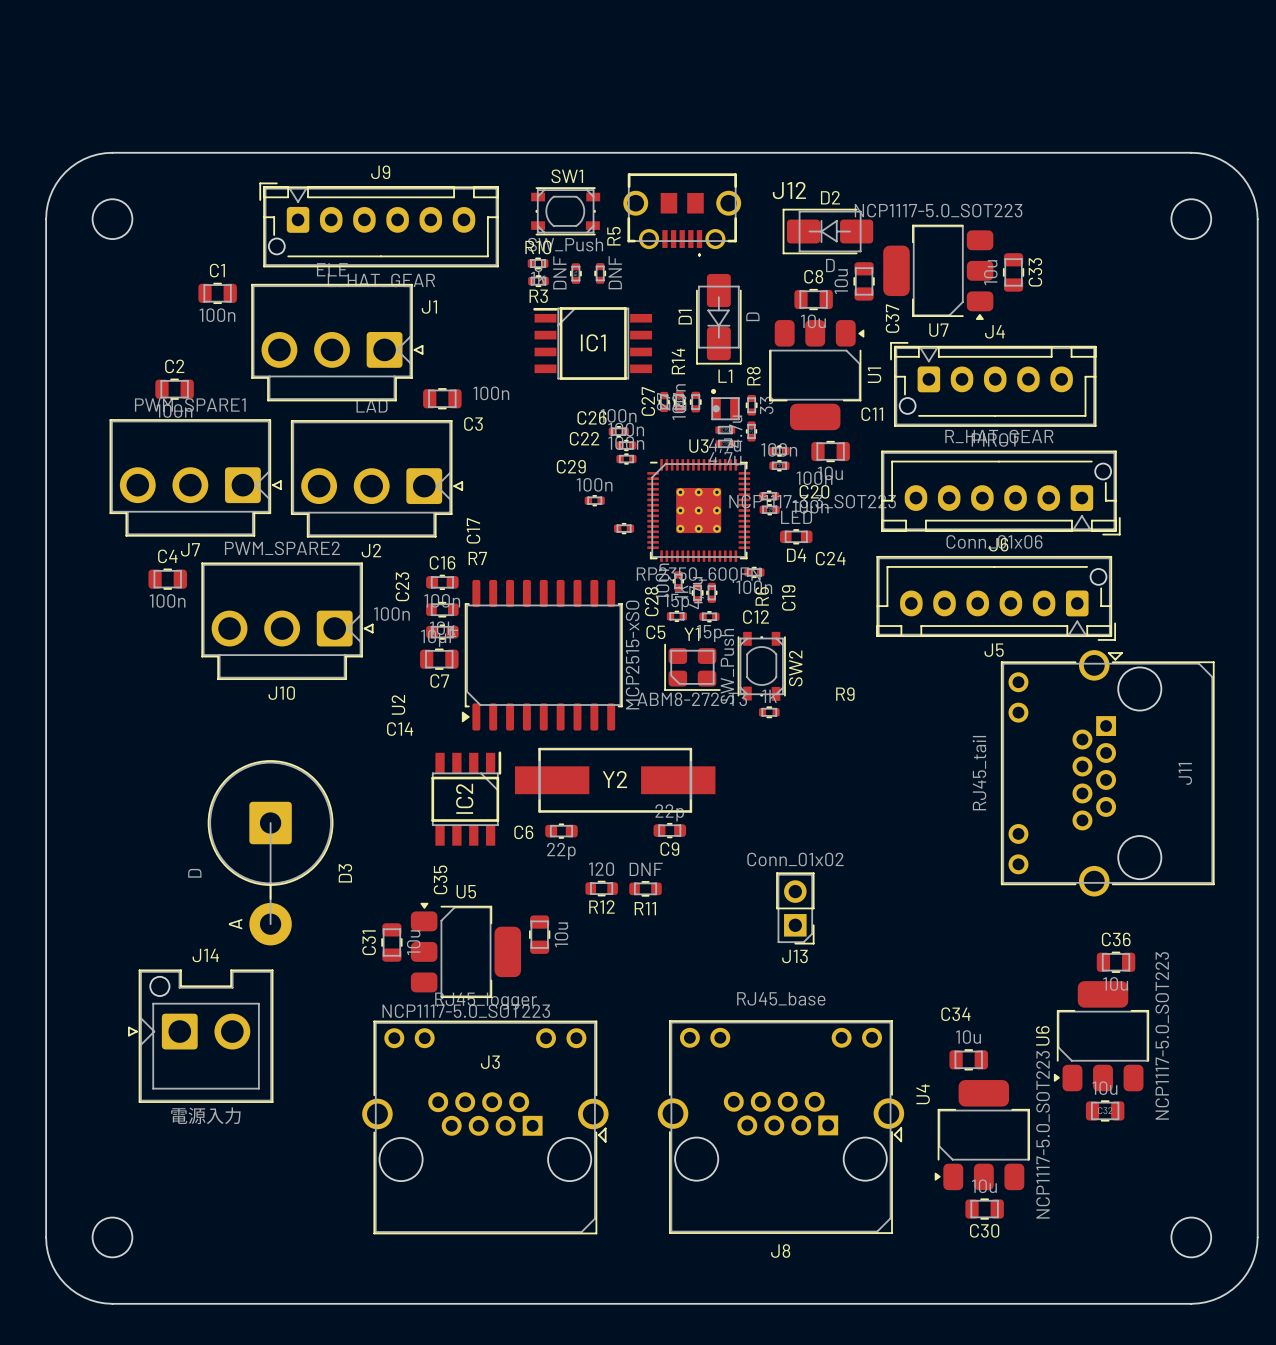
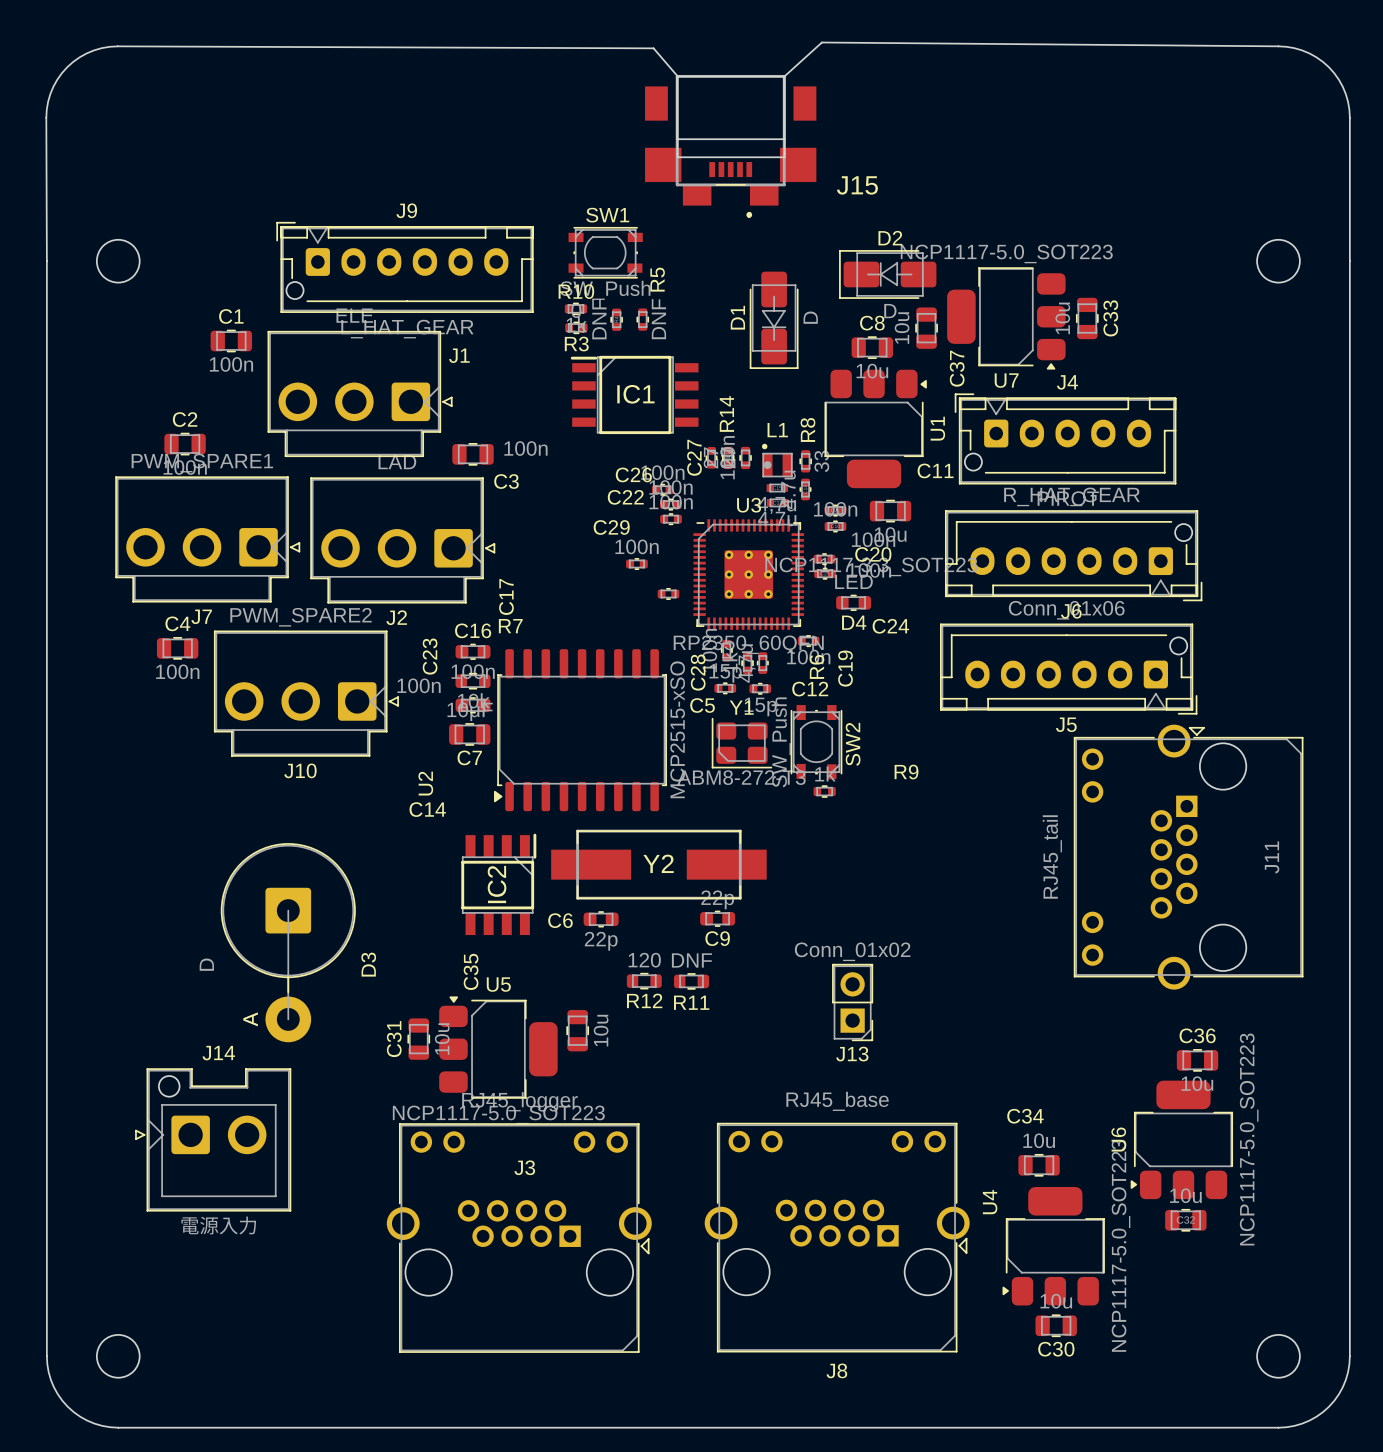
J15: none -> (730, 146)
J12: (682, 214) -> none
board edge: (46, 219) (49, 197) (56, 183) (65, 172) (83, 159) (97, 154) (112, 152) (1198, 153) (1213, 156) (1226, 162) (1243, 177) (1253, 197) (1257, 219) -> (46, 261) (46, 117) (48, 101) (53, 86) (67, 67) (79, 57) (101, 48) (117, 46) (653, 48) (677, 76) (677, 157) (784, 157) (784, 76) (821, 42) (1278, 46) (1294, 48) (1309, 53) (1322, 61) (1334, 73) (1342, 86) (1348, 101) (1349, 117) (1349, 261)
D1 position: (718, 319) -> (774, 320)

